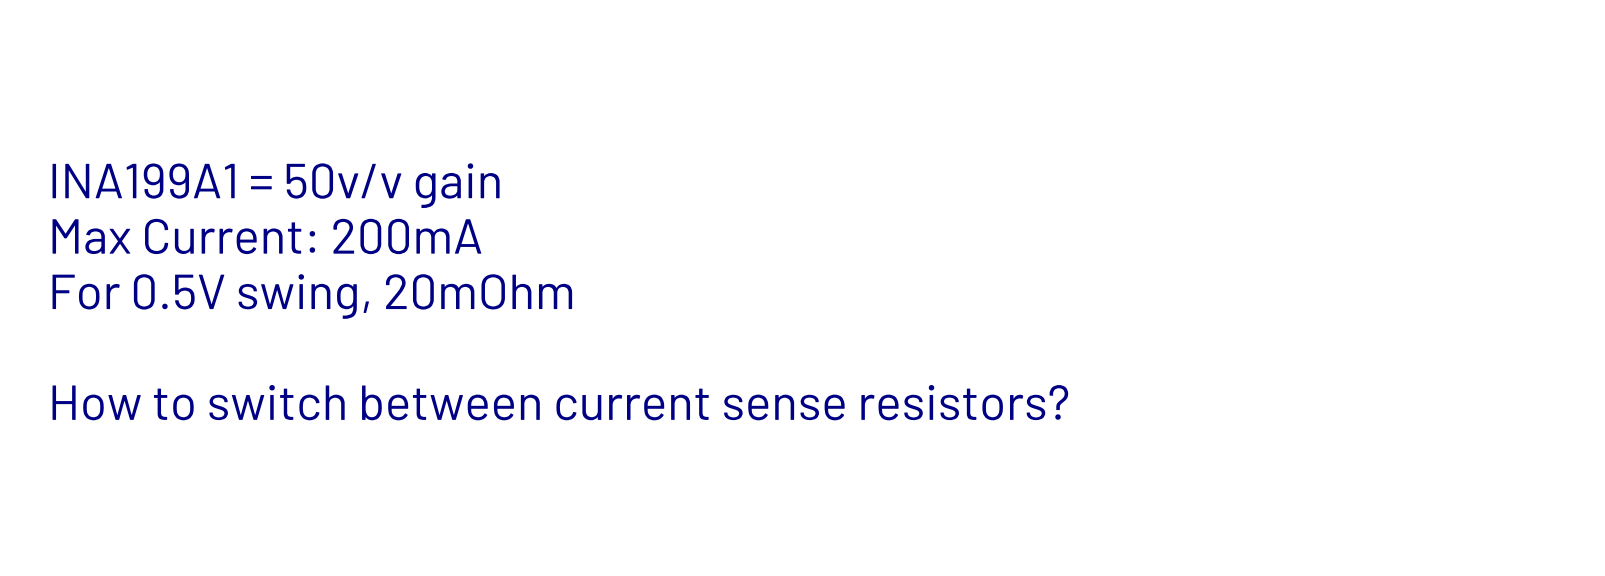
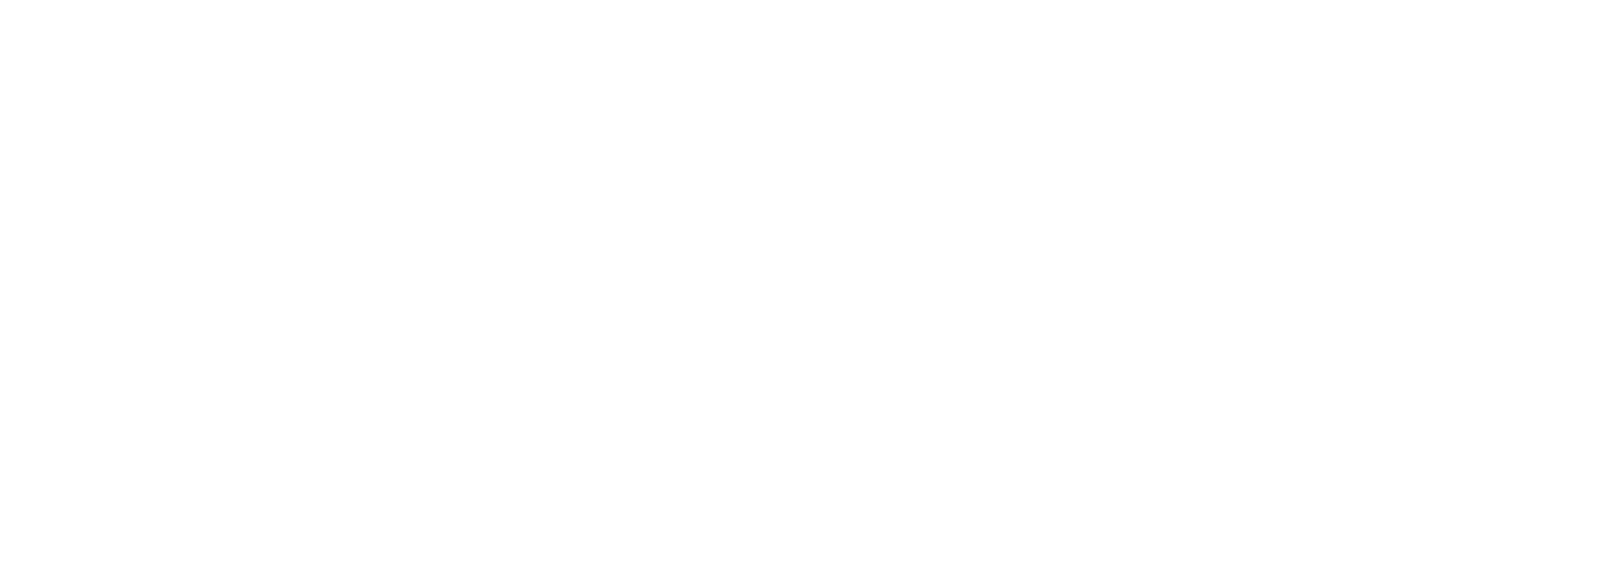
text: INA199A1 = 50v/v gain (276, 185) -> none
text: Max Current: 200mA (266, 236) -> none
text: For 0.5V swing, 20mOhm (312, 296) -> none
text: How to switch between current sense resistors? (560, 402) -> none

